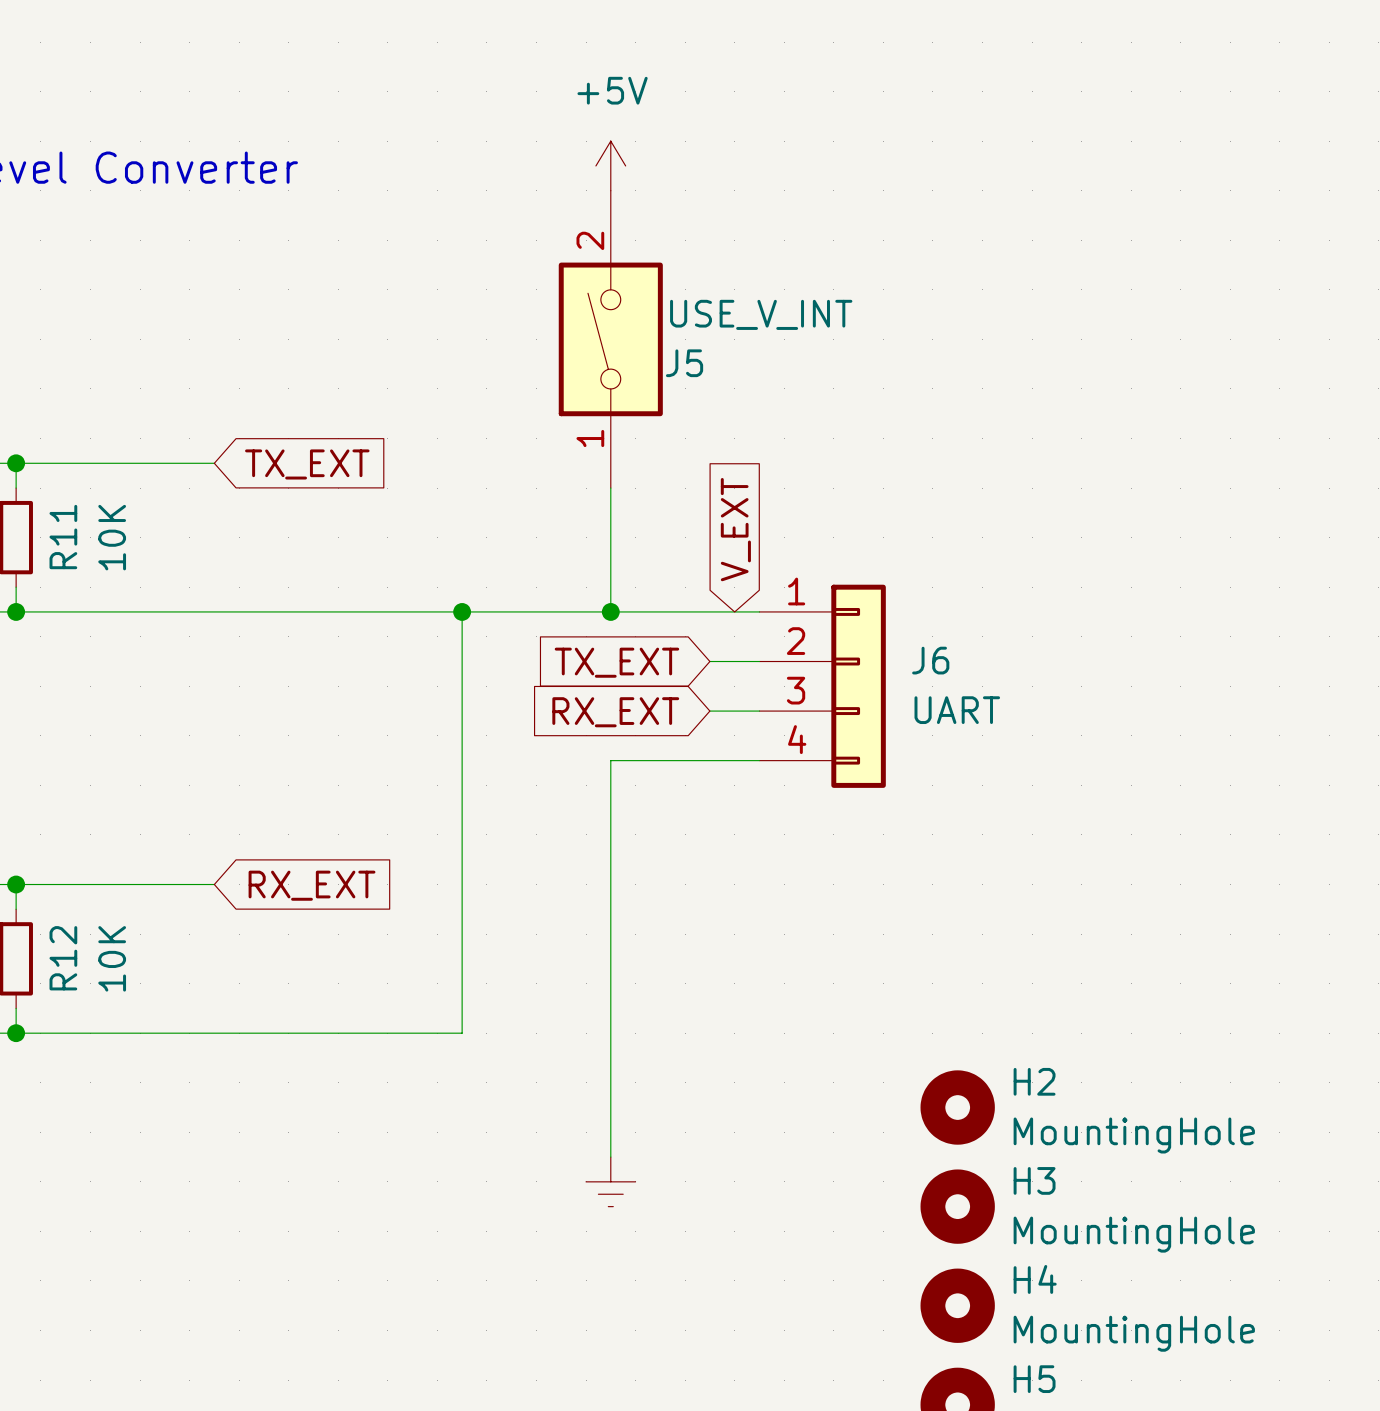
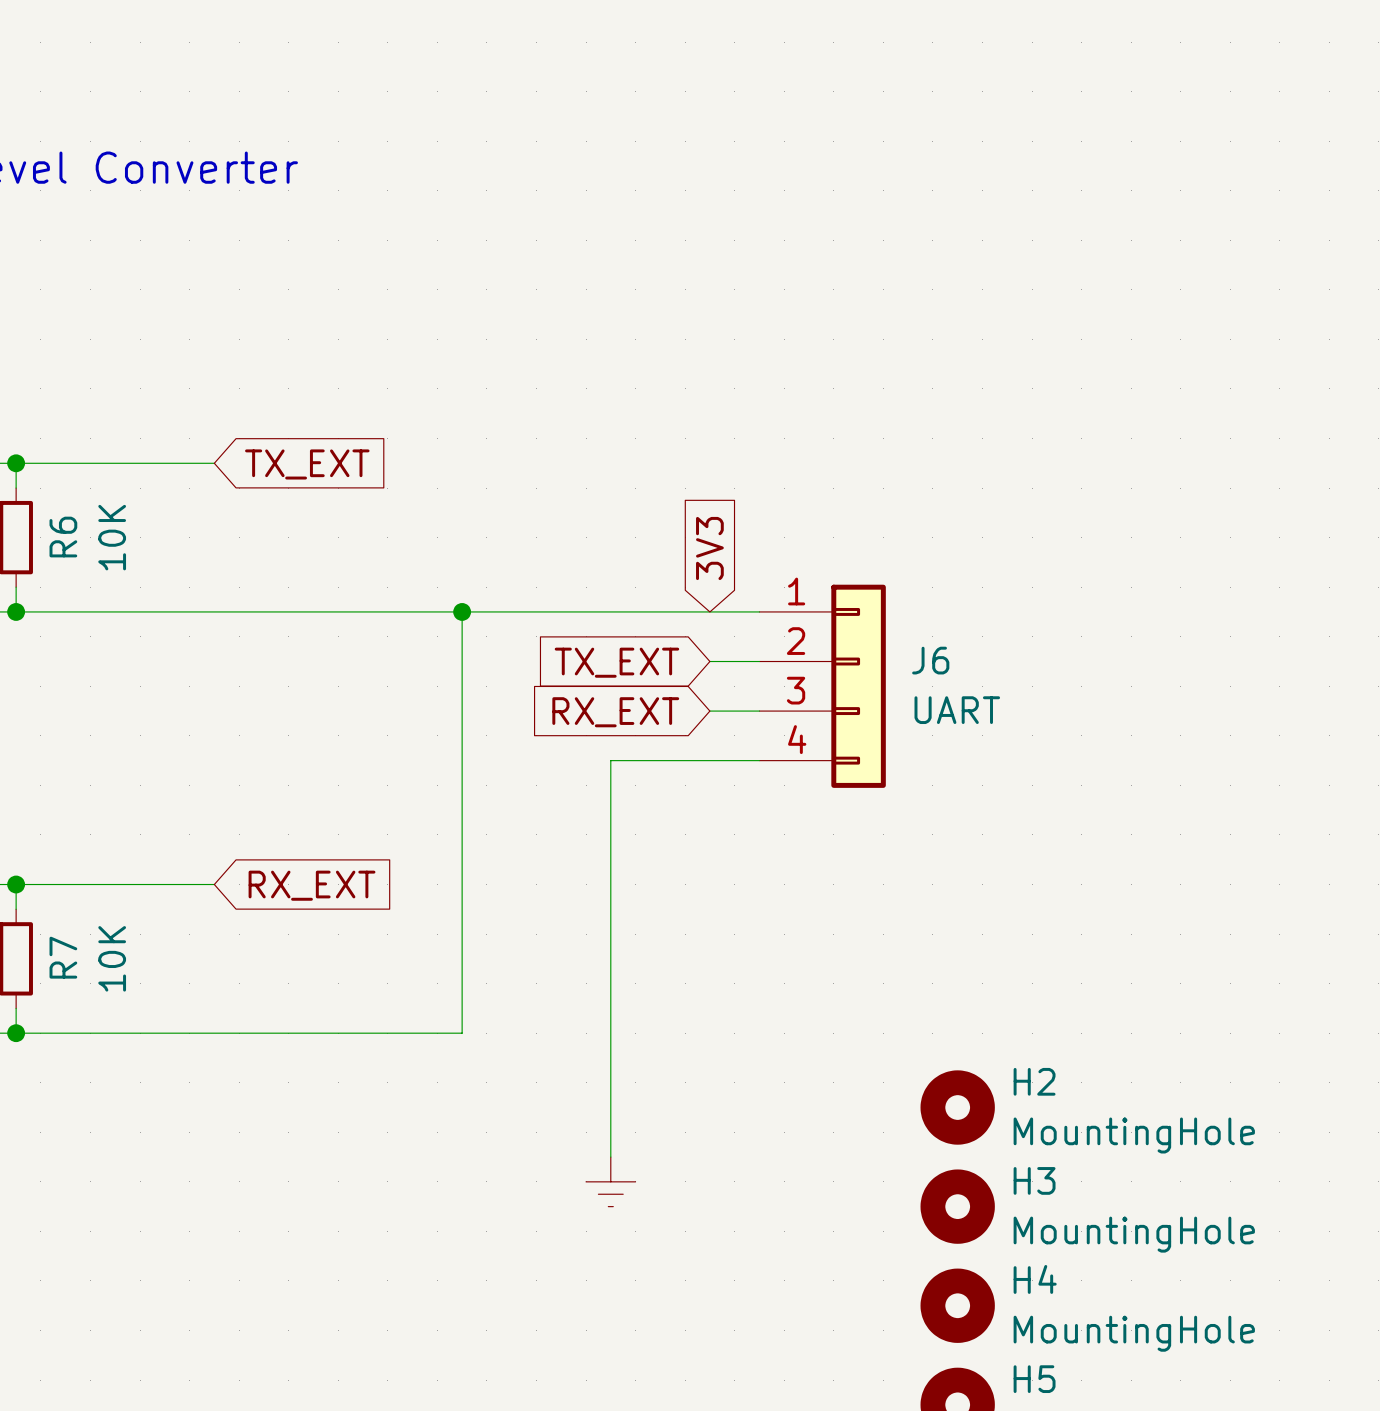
power symbol: +5V (610, 165) -> none
J5: USE_V_INT (610, 339) -> none
wire: (610, 488) (610, 611) -> none
global label: V_EXT (735, 529) -> none
R11 name: R11 (63, 537) -> R6 (63, 537)
global label: none -> 3V3 (709, 548)
junction: (610, 611) -> none
R12 name: R12 (63, 958) -> R7 (63, 957)

